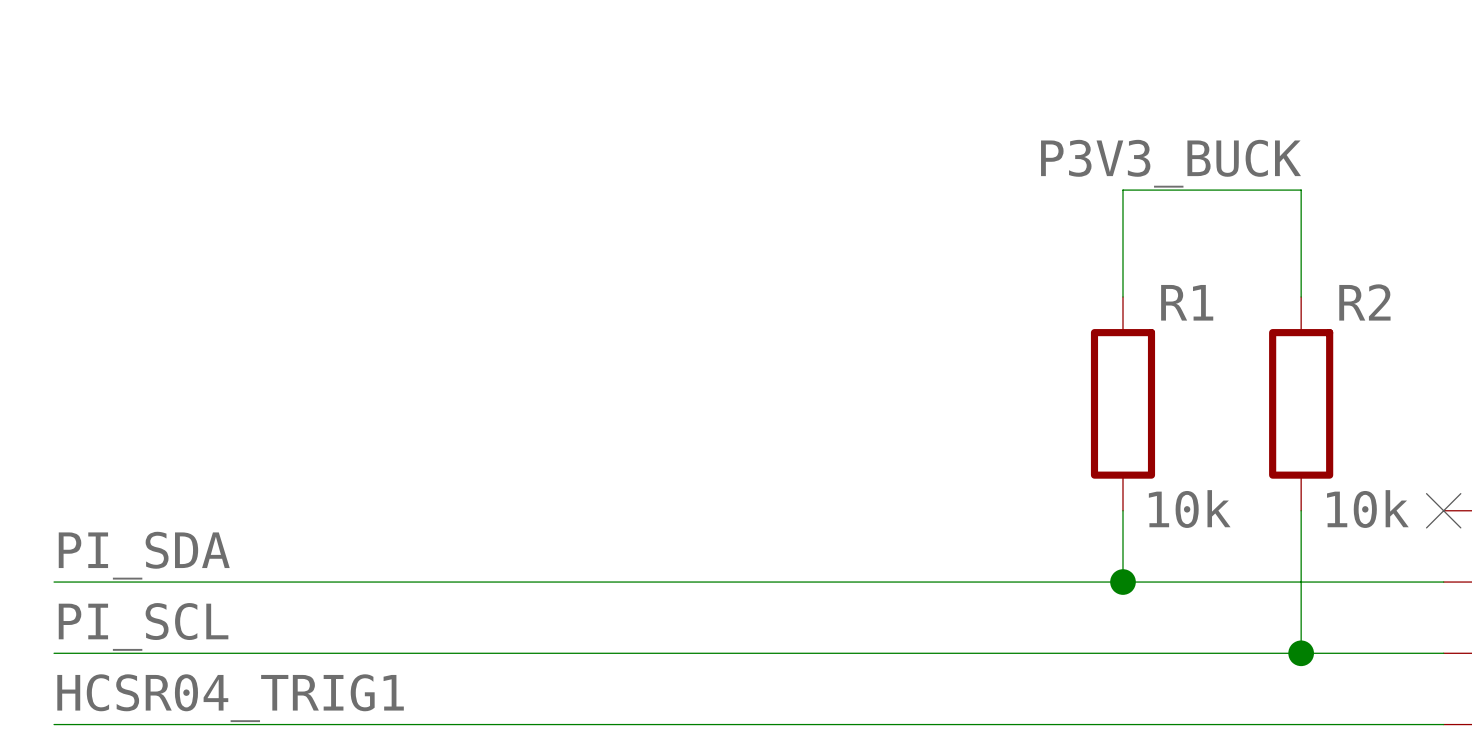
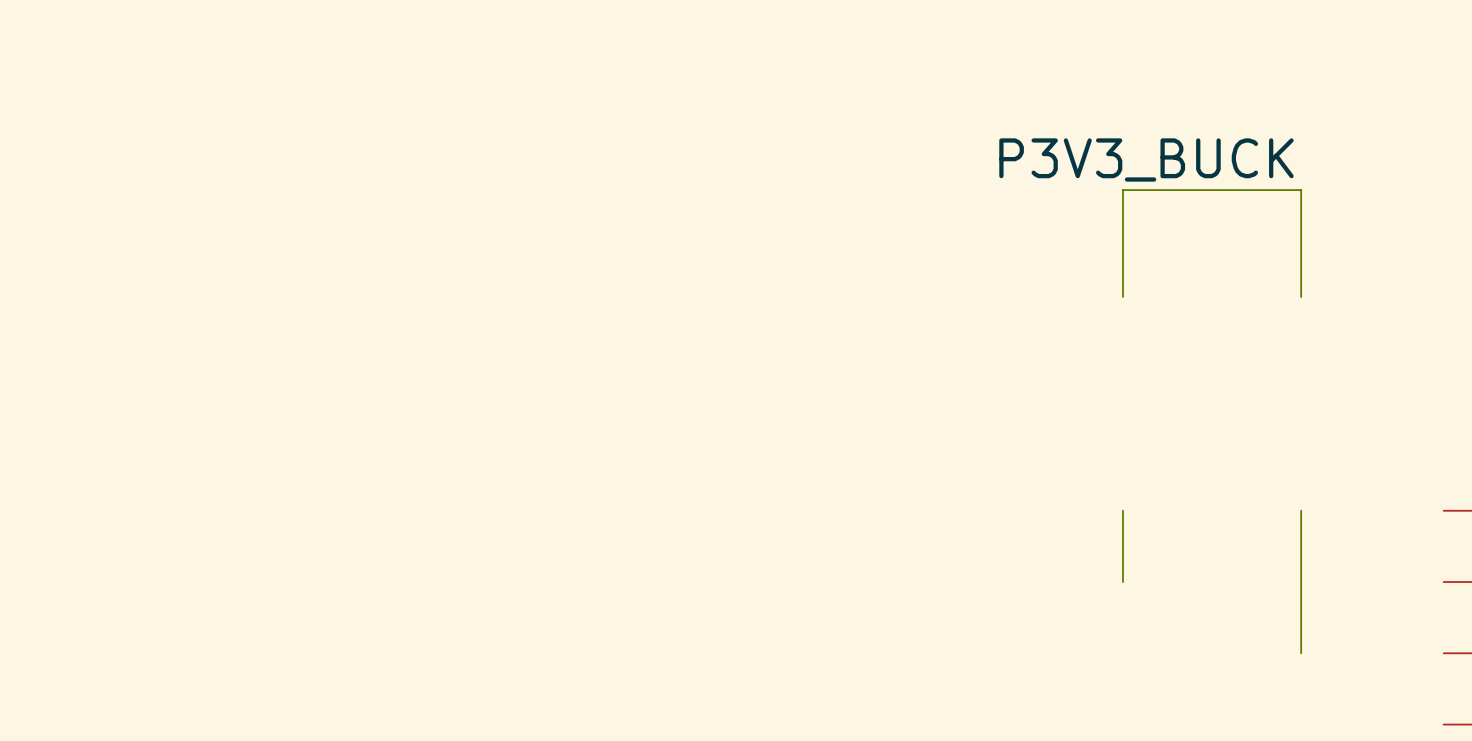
R1: 10k (1122, 403) -> none
R2: 10k (1301, 403) -> none
no-connect mark: (1443, 510) -> none
label: PI_SDA (144, 555) -> none
wire: (54, 582) (1443, 582) -> none
junction: (1122, 582) -> none
label: PI_SCL (143, 626) -> none
wire: (54, 653) (1443, 653) -> none
junction: (1301, 653) -> none
label: HCSR04_TRIG1 (230, 698) -> none
wire: (54, 724) (1443, 724) -> none

